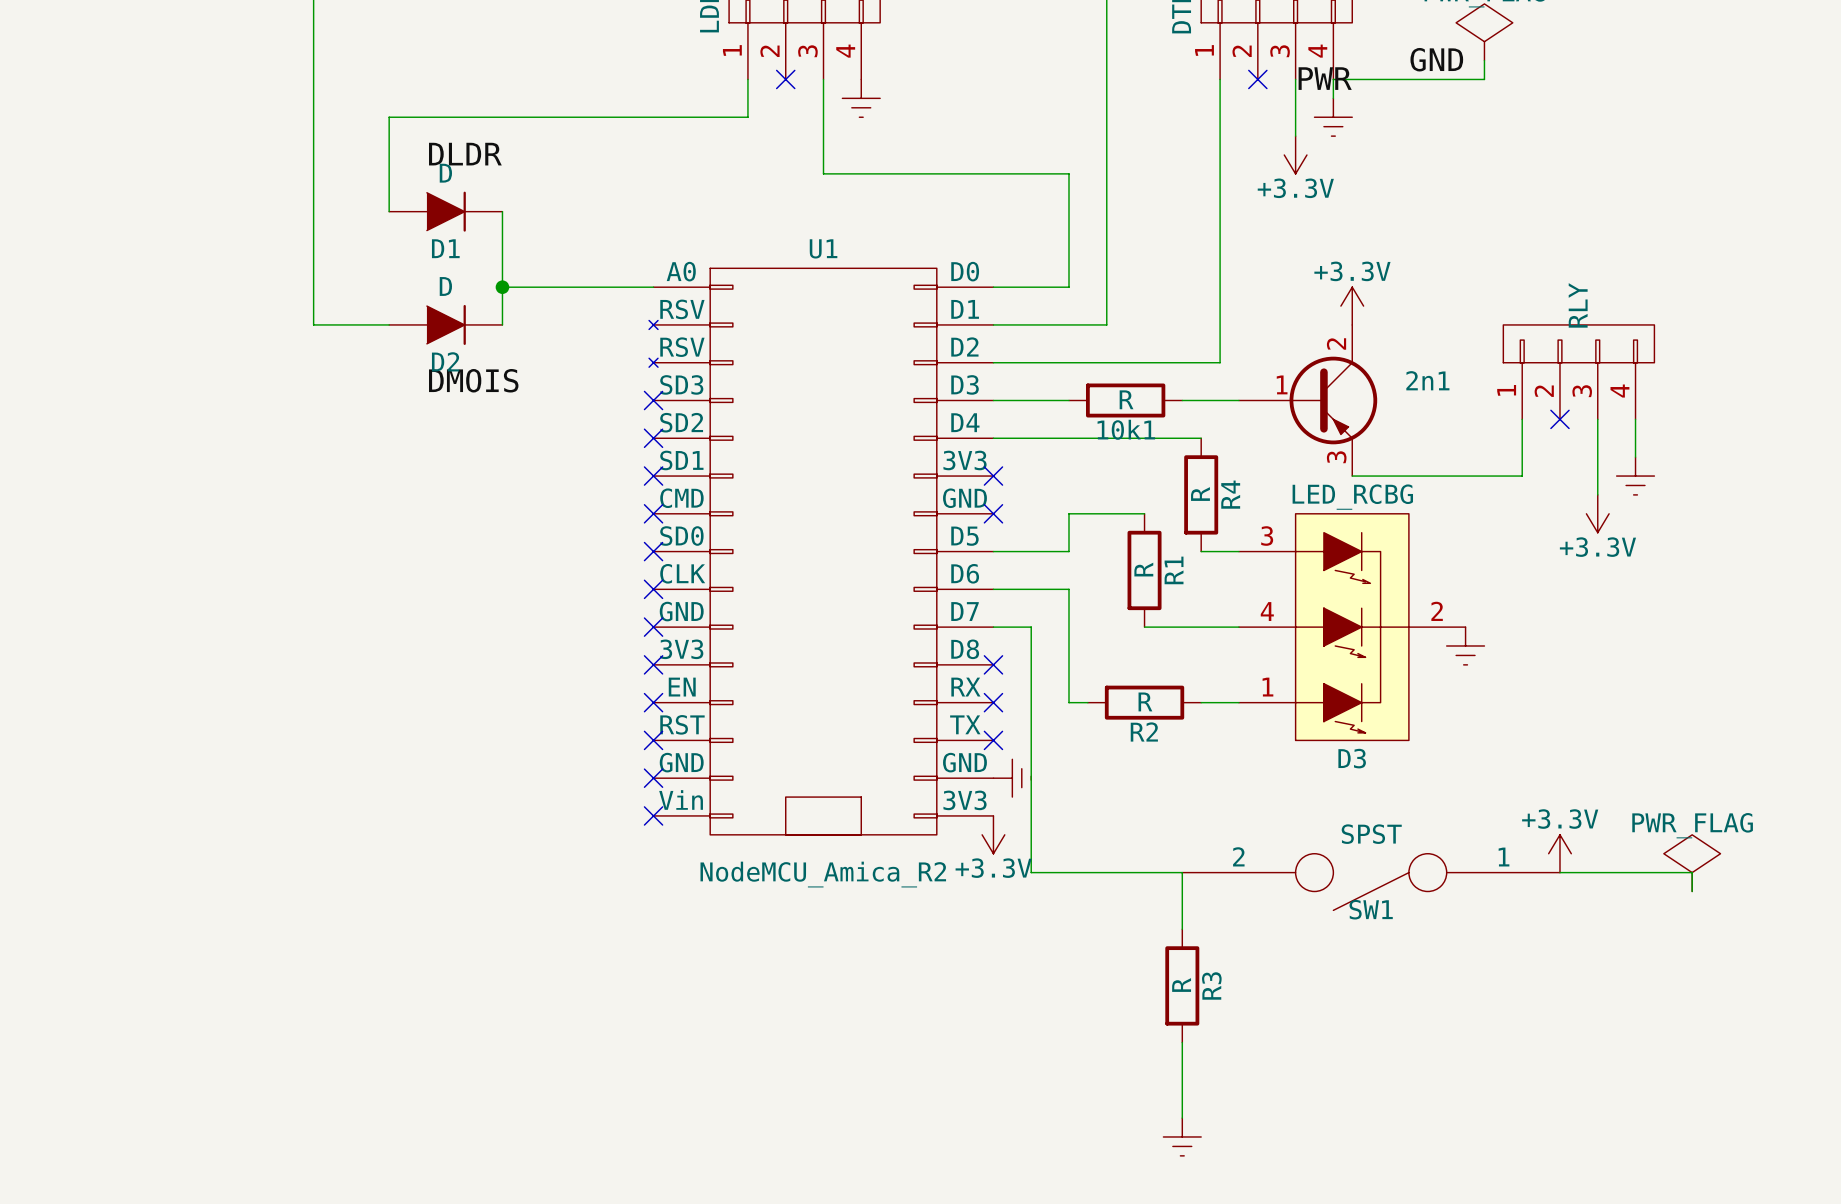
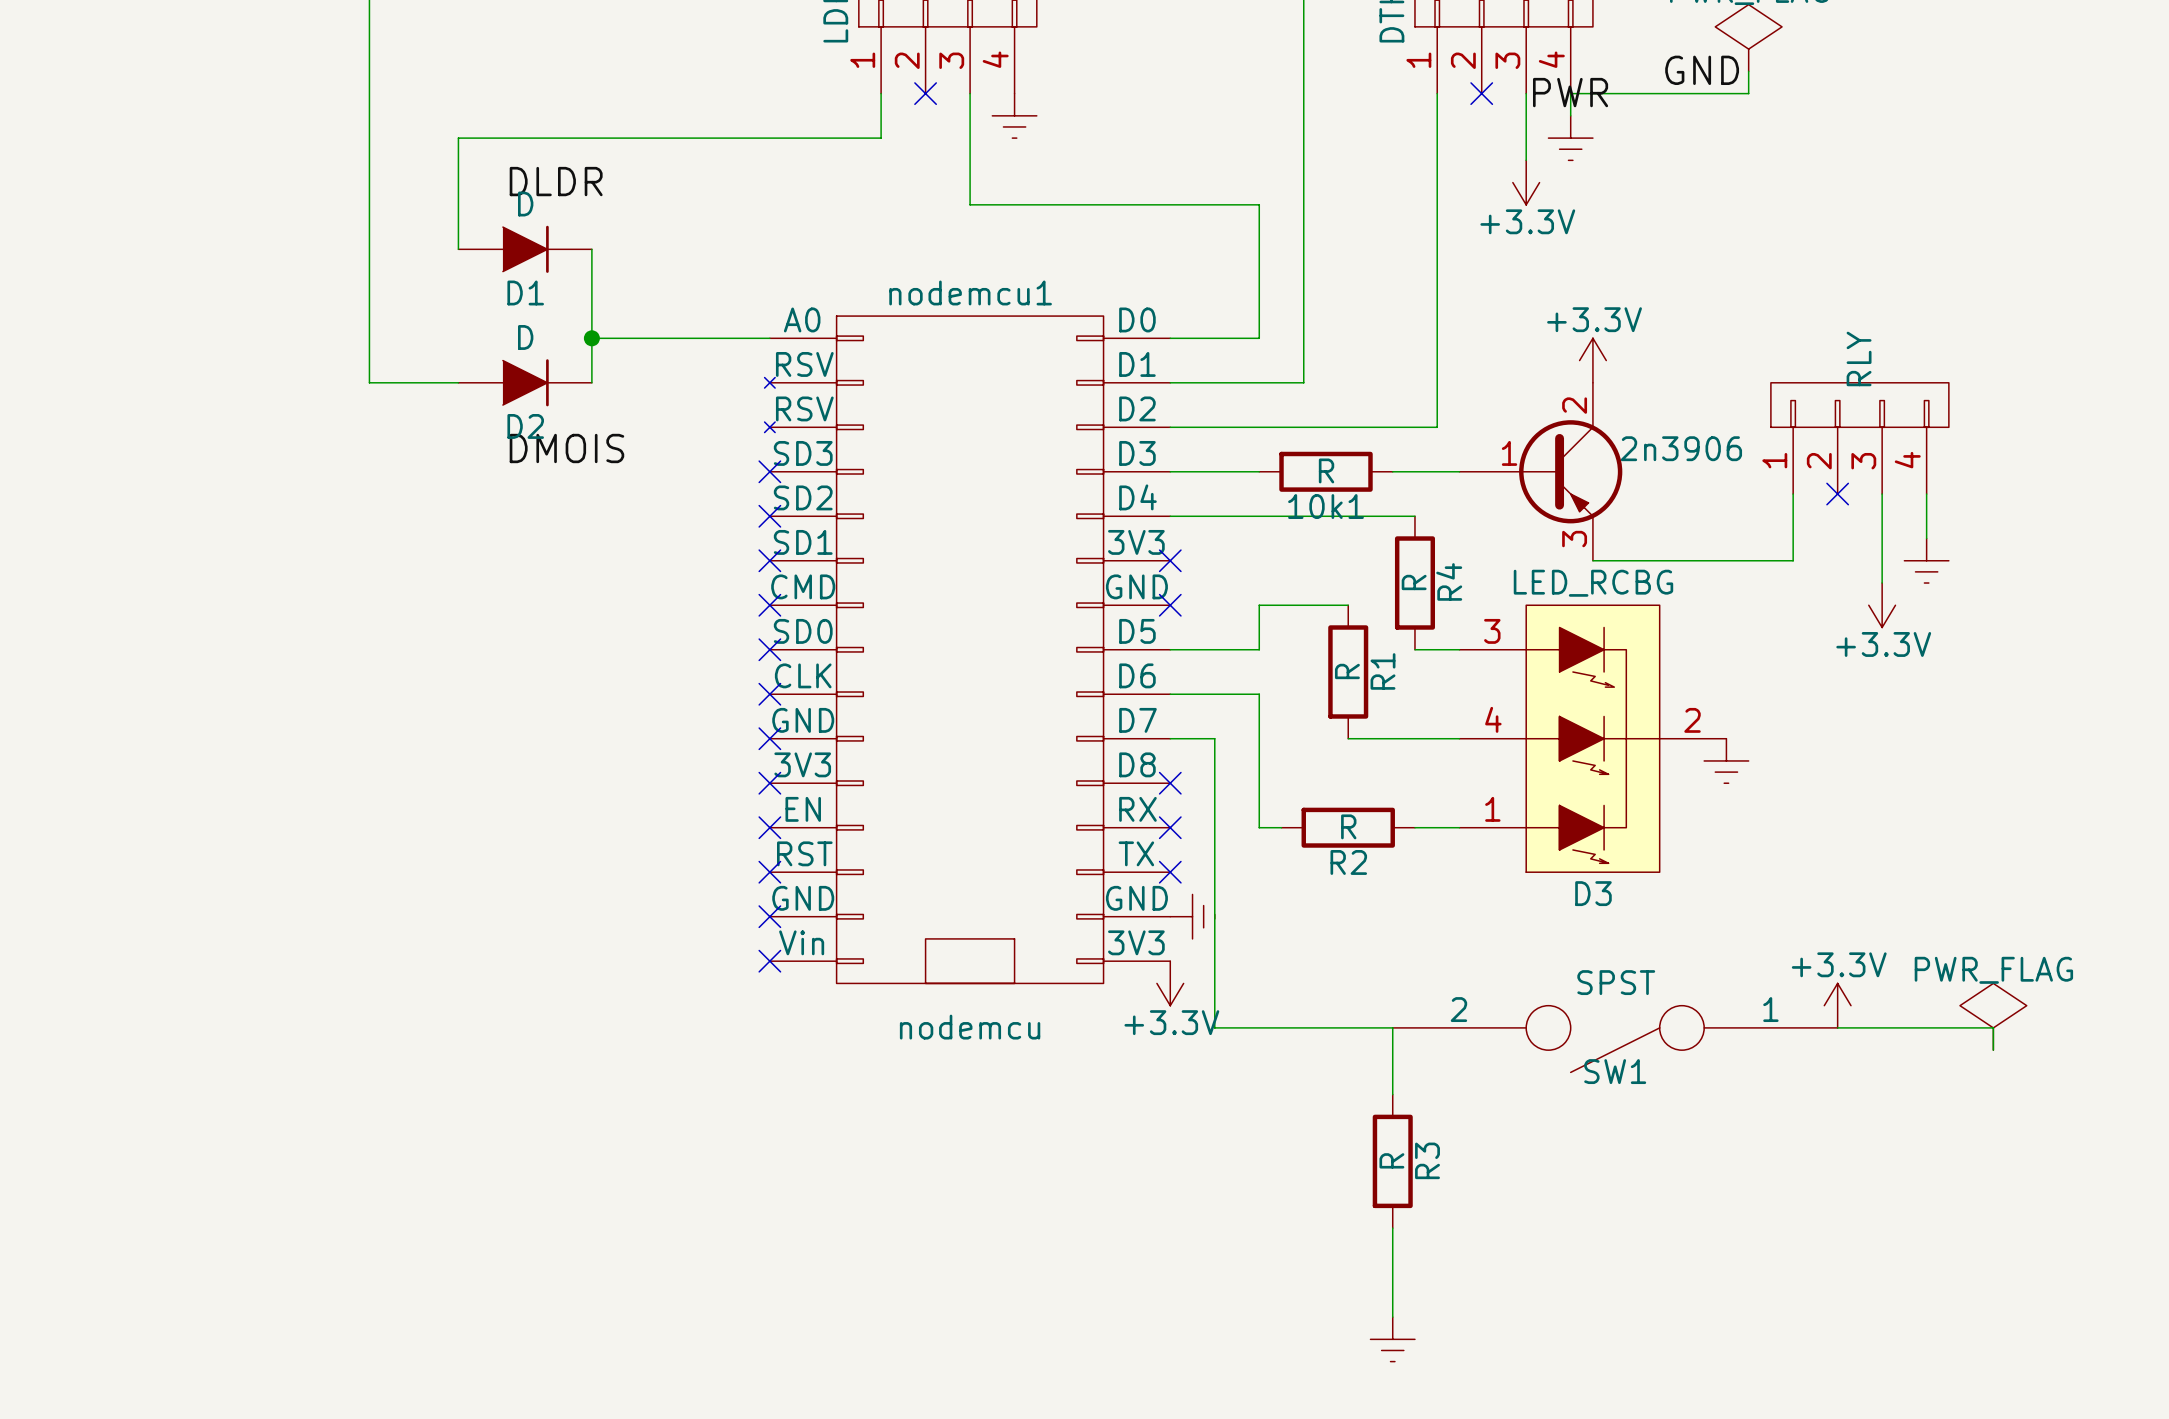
U1 name: U1 (823, 248) -> nodemcu1 (970, 292)
2n1 name: 2n1 (1427, 380) -> 2n3906 (1681, 448)
U1 value: NodeMCU_Amica_R2 (823, 874) -> nodemcu (970, 1027)

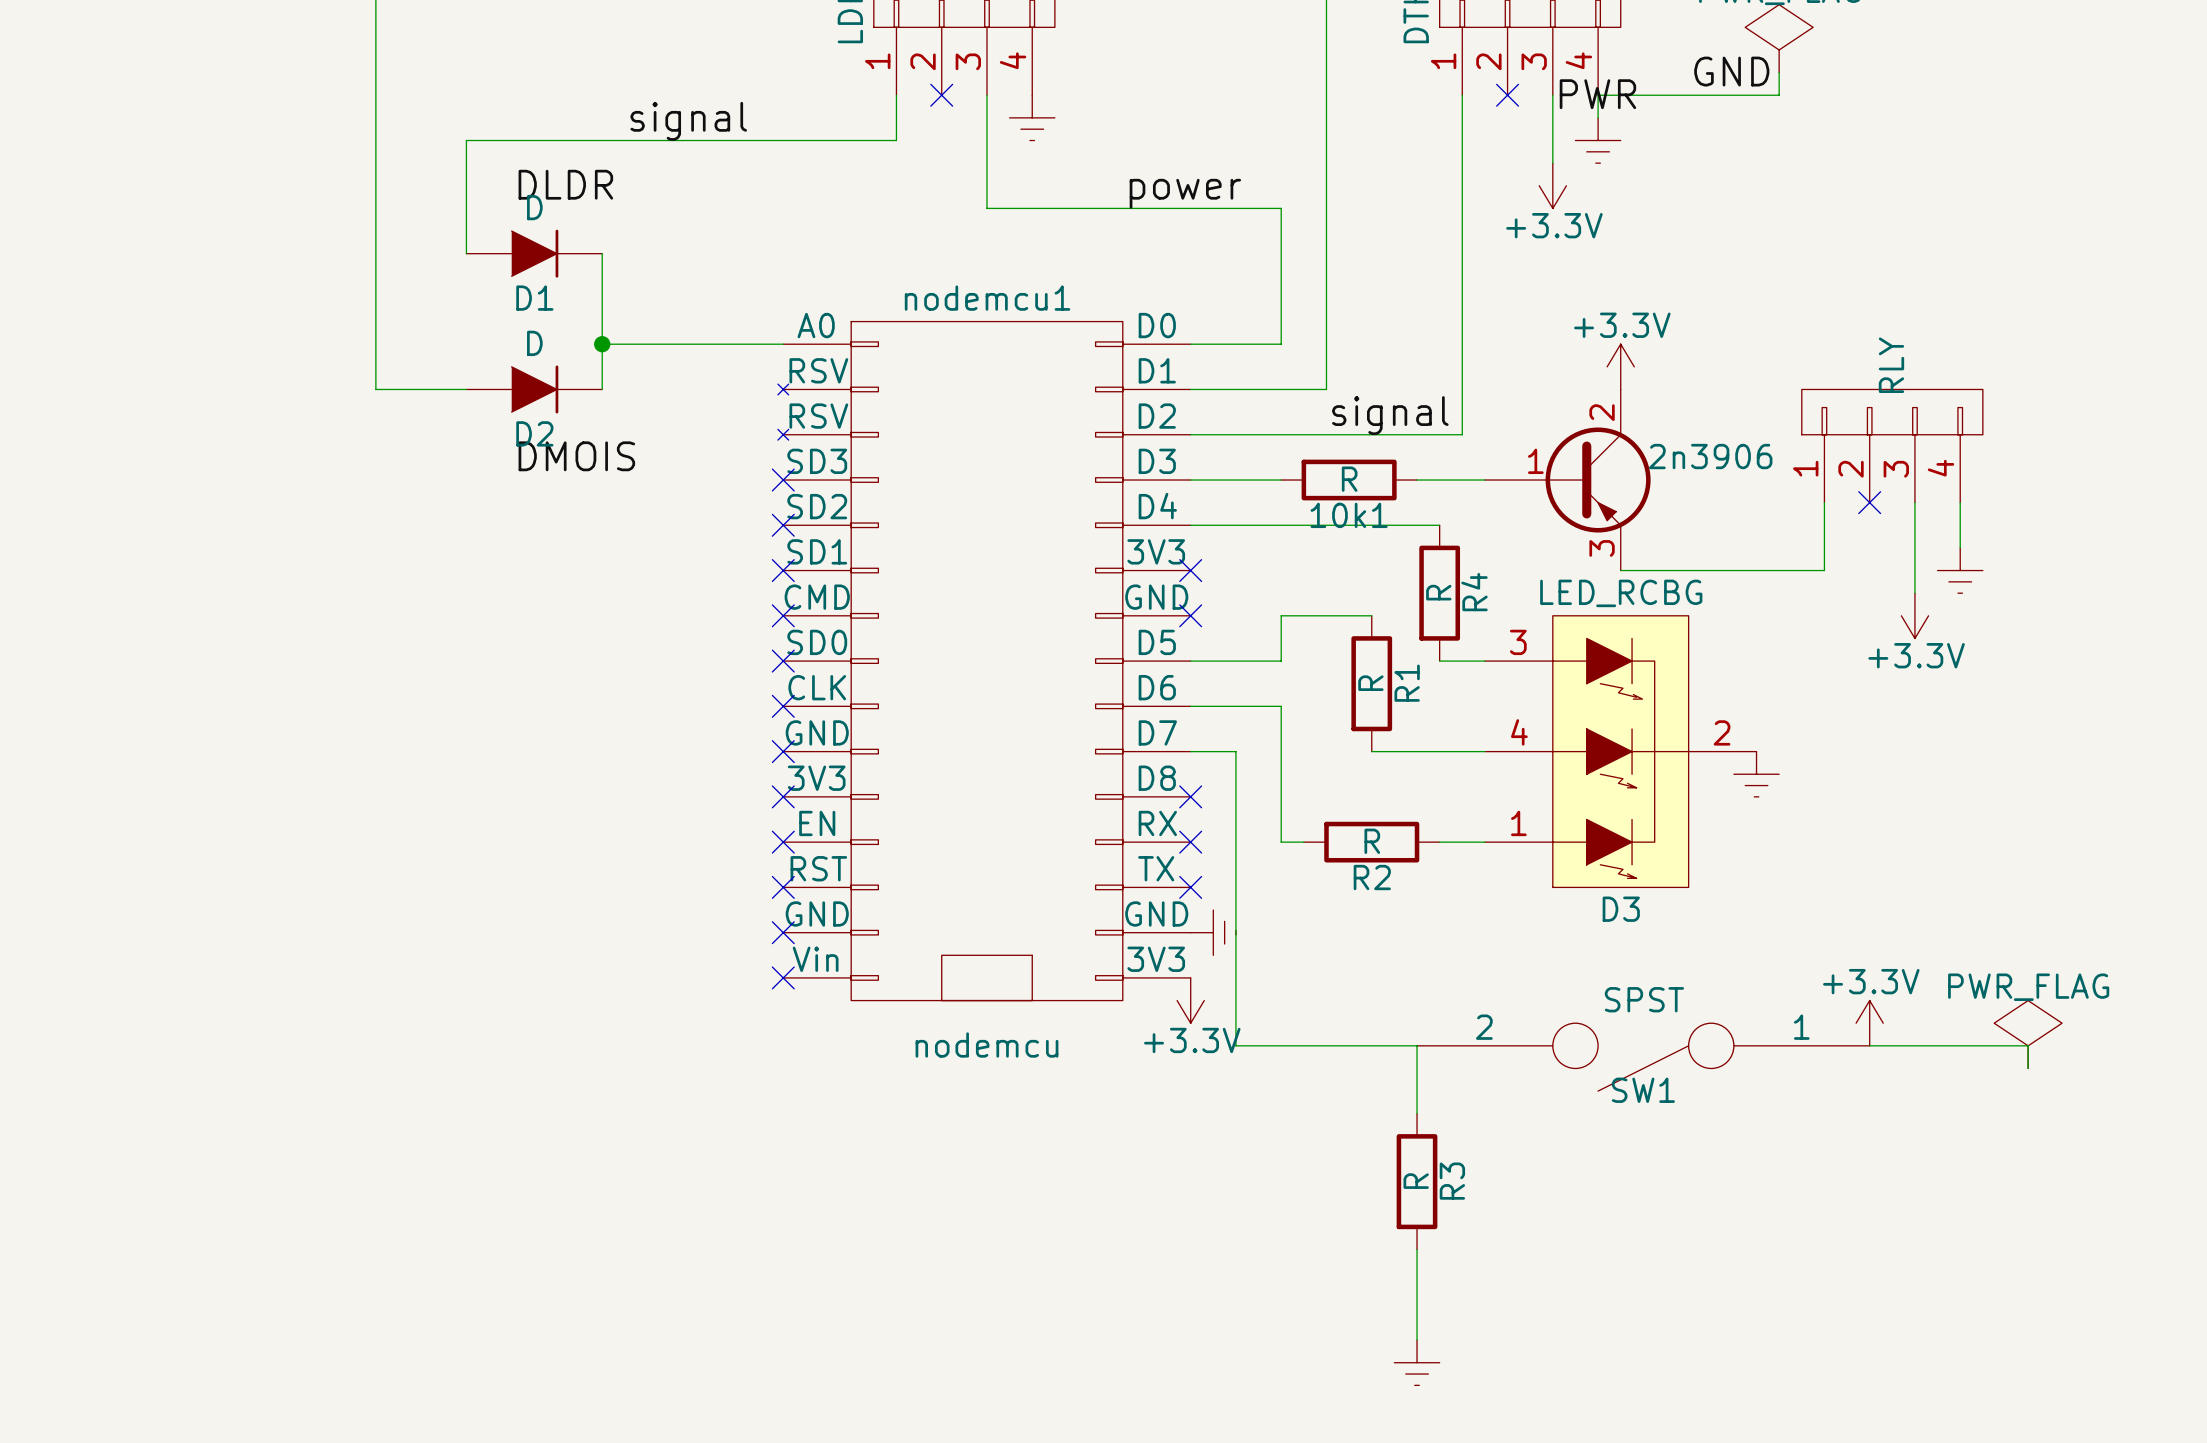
label: none -> signal (688, 121)
label: none -> power (1185, 193)
label: none -> signal (1390, 415)

